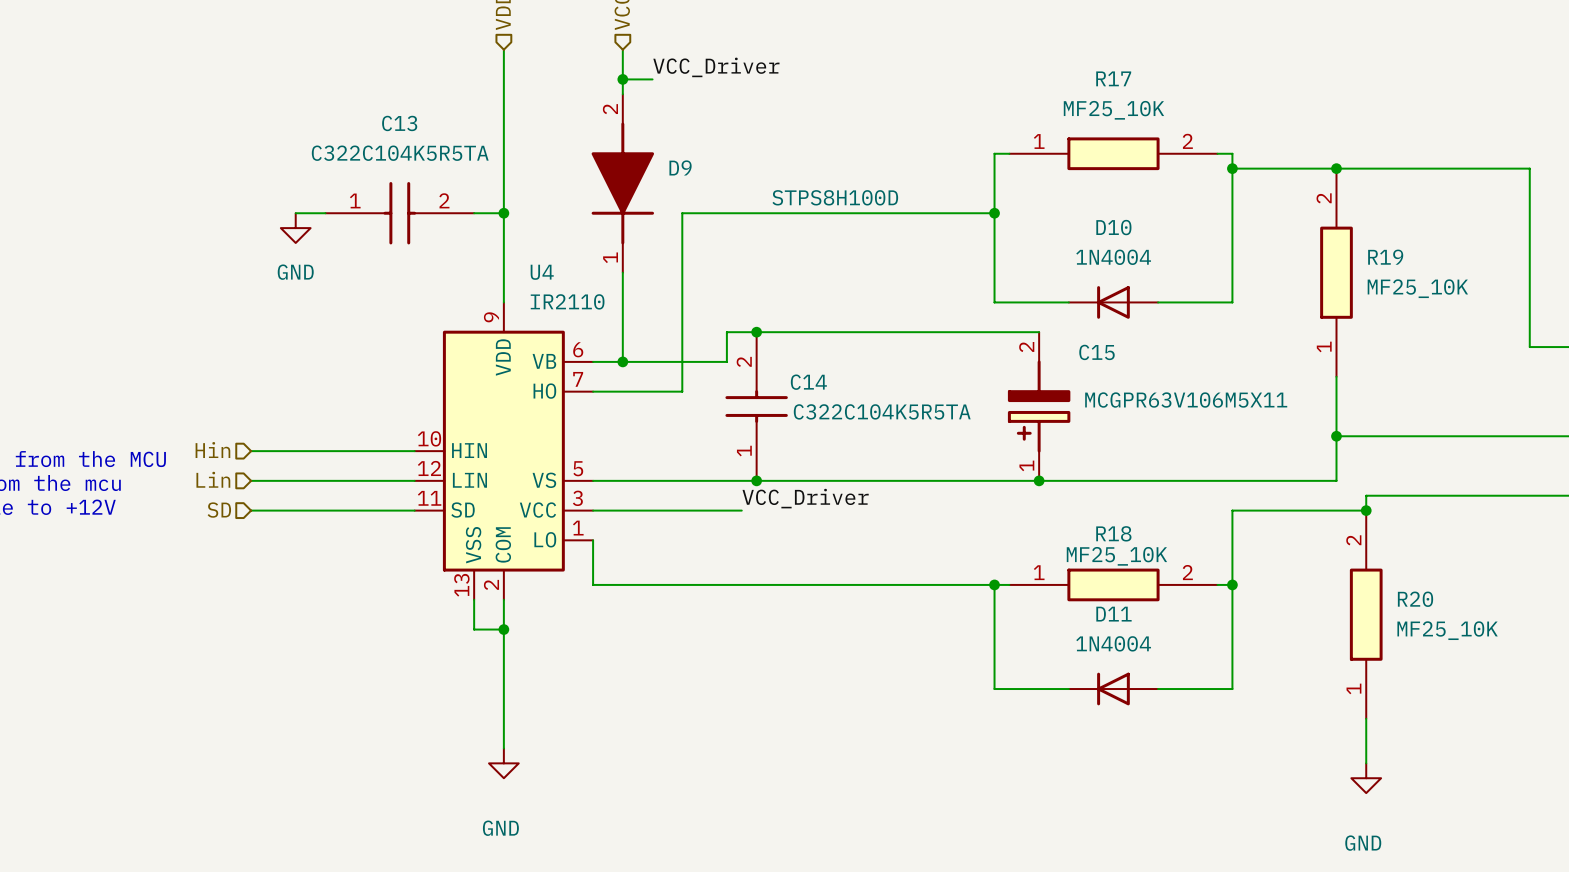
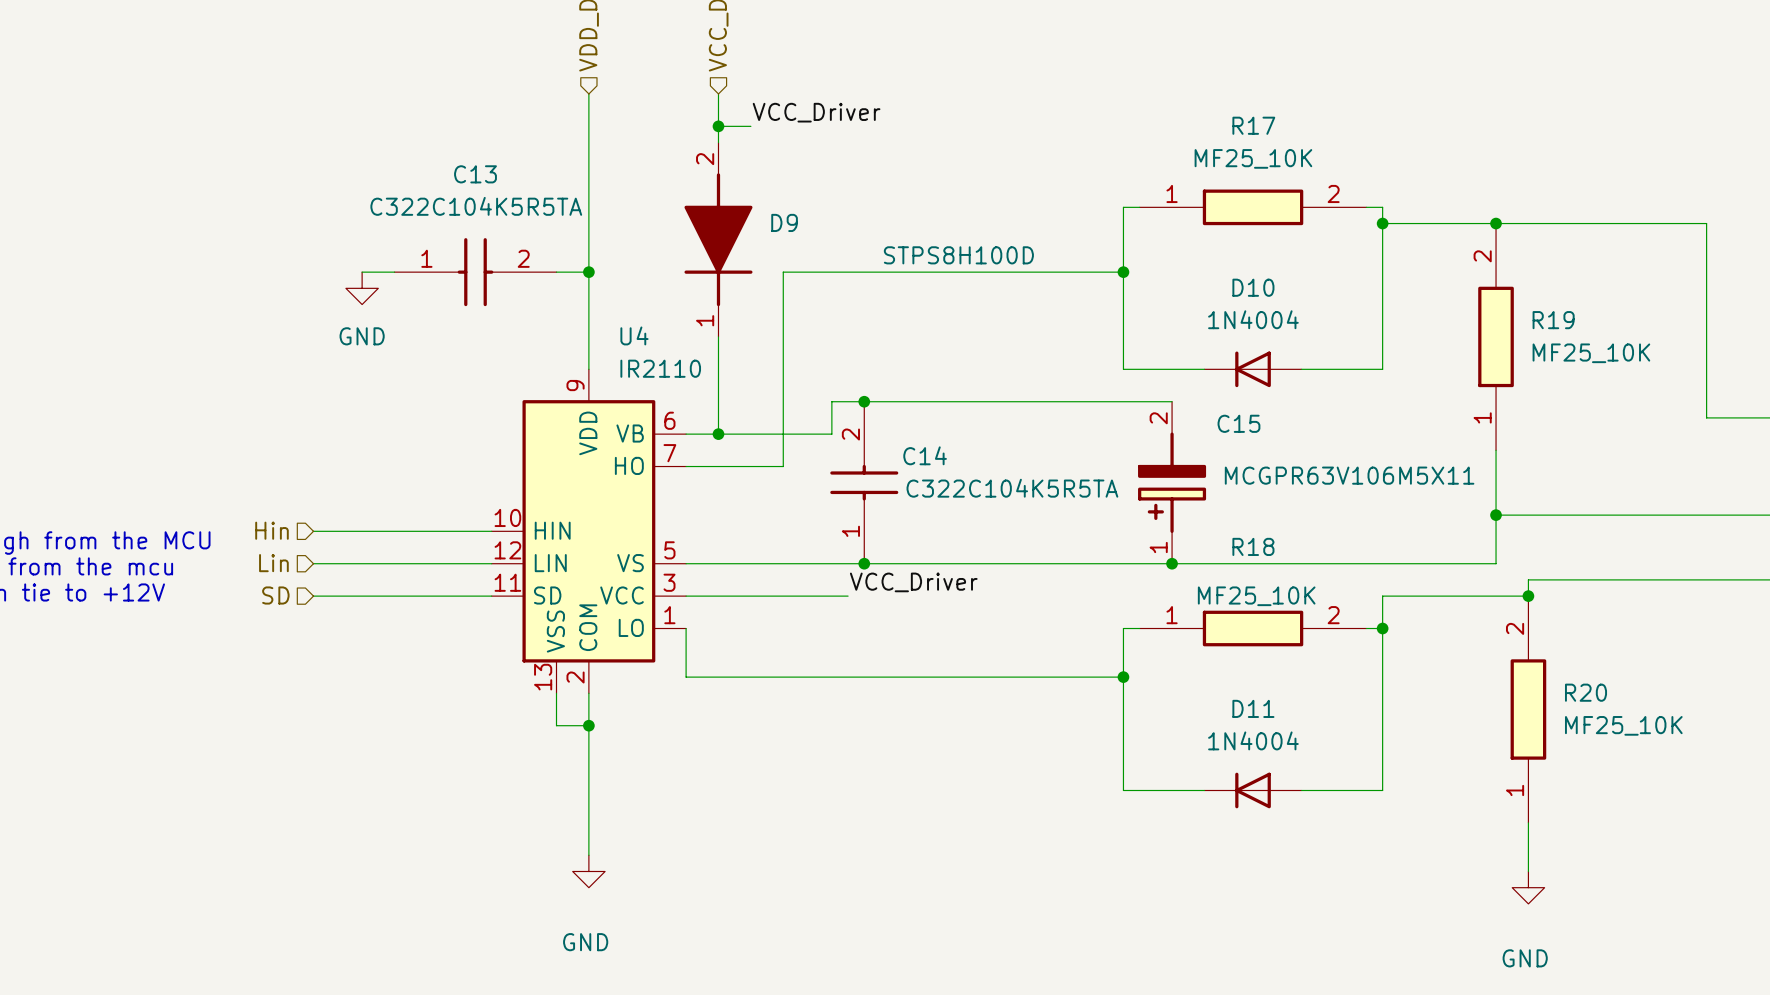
R18 name position: R18 (1113, 533) -> R18 (1253, 546)
wire: (994, 584) (1009, 584) -> (1123, 677) (1123, 628) (1139, 628)
R18 position: (1113, 584) -> (1253, 628)
wire: (1217, 584) (1232, 584) -> (1366, 628) (1382, 628)
junction position: (1232, 584) -> (1382, 628)

